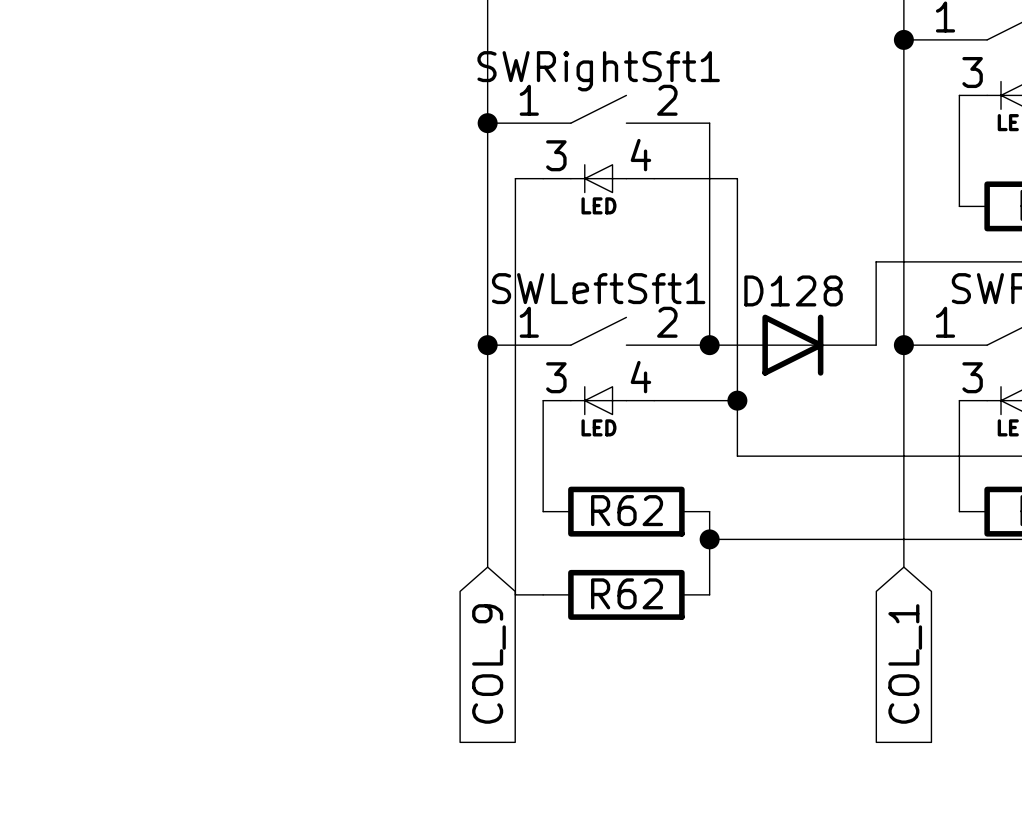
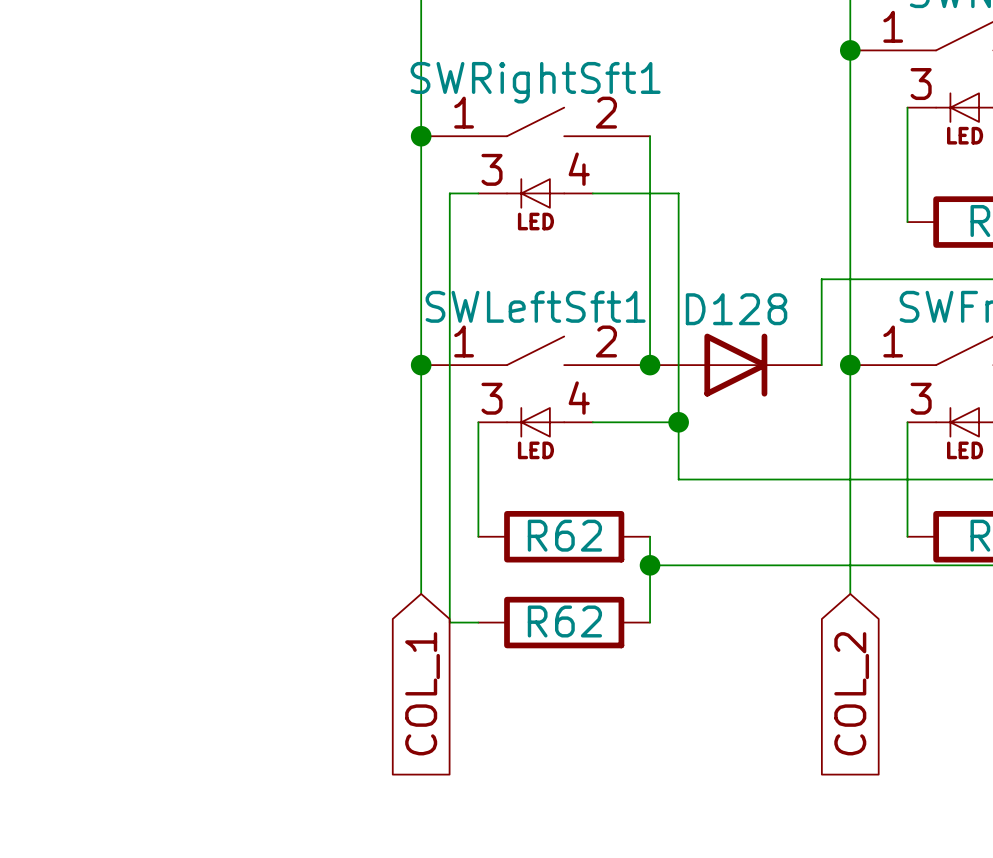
global label: COL_9 (488, 663) -> COL_1 (422, 693)
global label: COL_1 (905, 663) -> COL_2 (851, 693)

